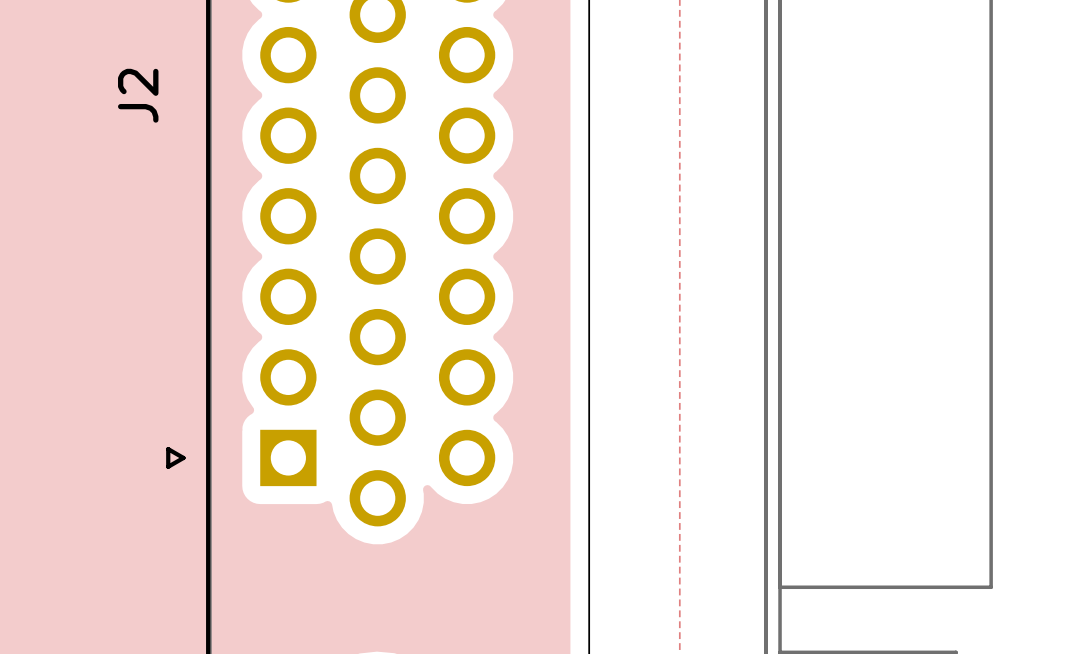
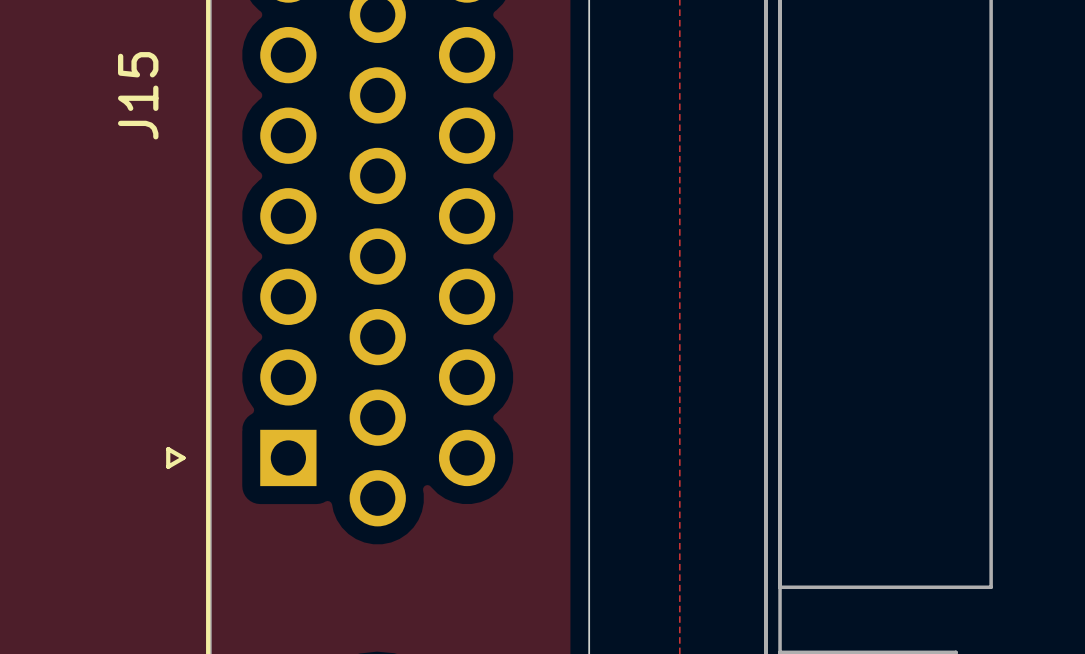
J2 name: J2 (138, 95) -> J15 (138, 95)

